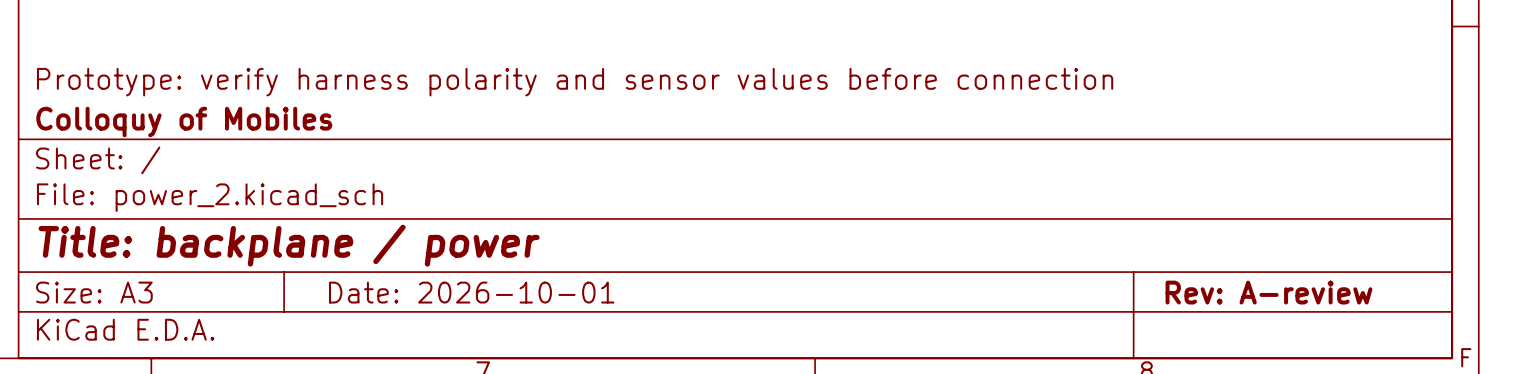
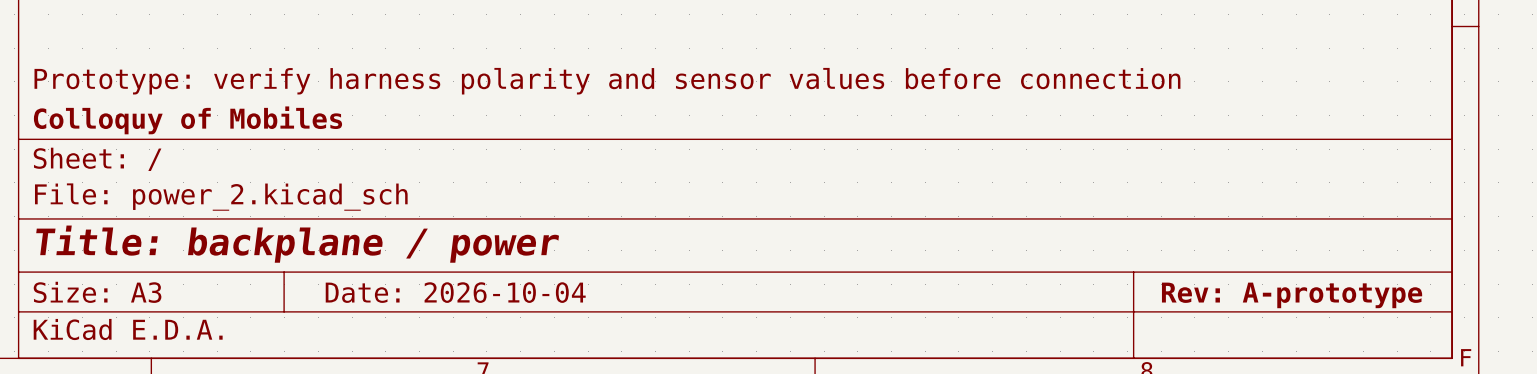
title block: Date: 2026-10-01 (471, 292) -> Date: 2026-10-04 (455, 292)
title block: Rev: A-review (1268, 292) -> Rev: A-prototype (1292, 295)

